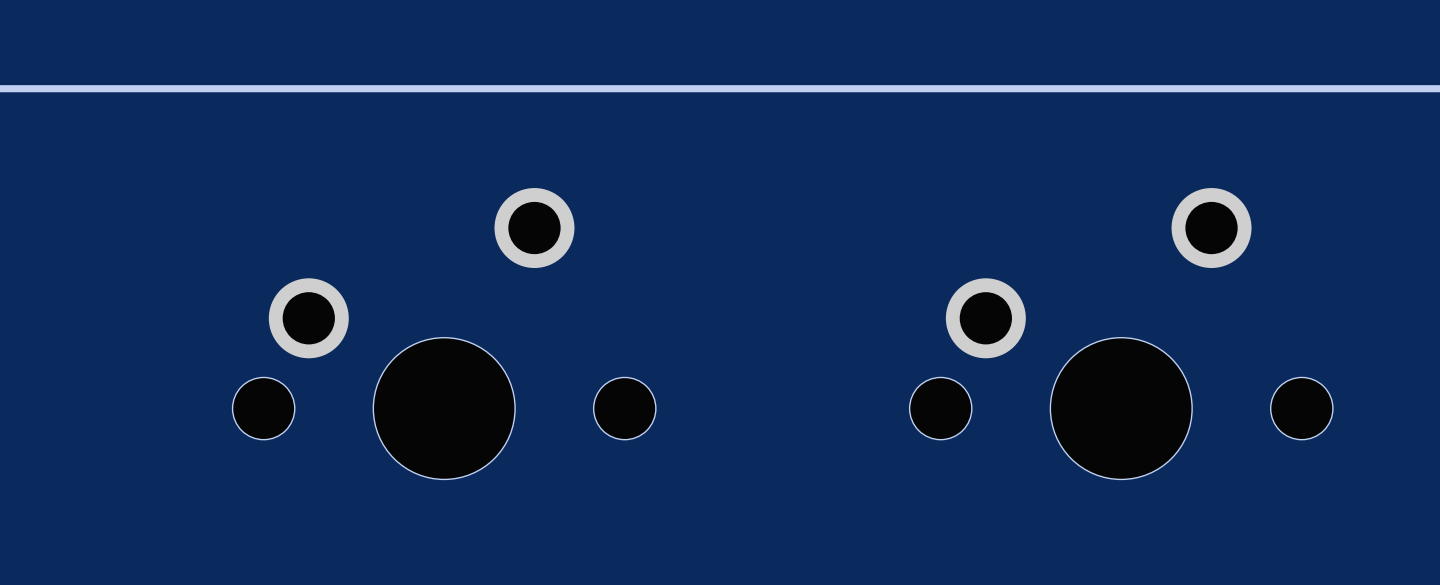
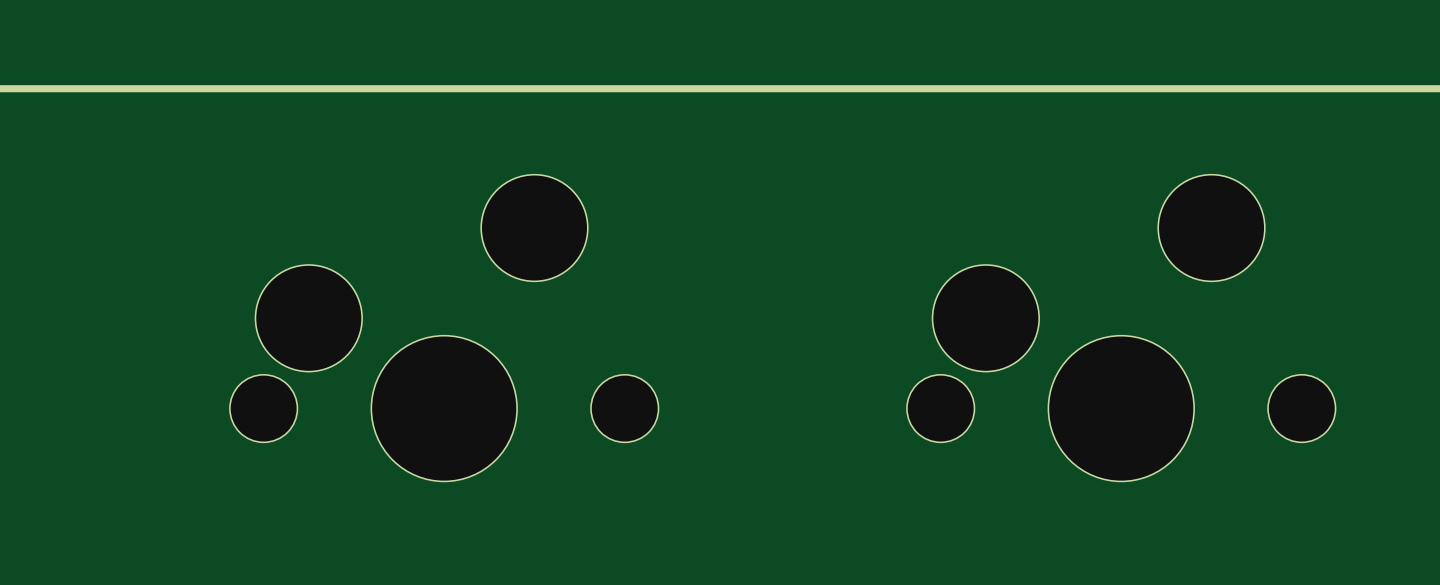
part footprint: [232, 188, 656, 480] -> [229, 174, 659, 482]
part footprint: [909, 188, 1333, 480] -> [906, 174, 1336, 482]

